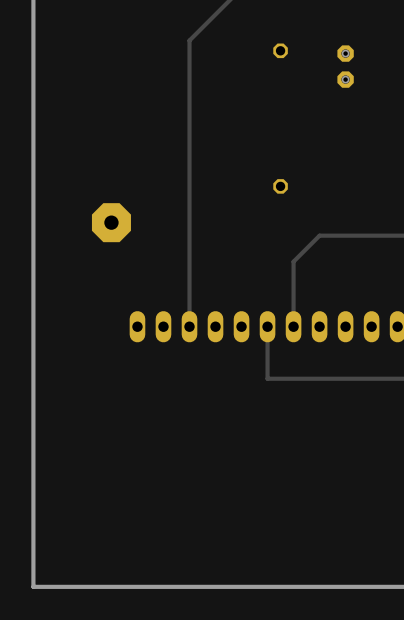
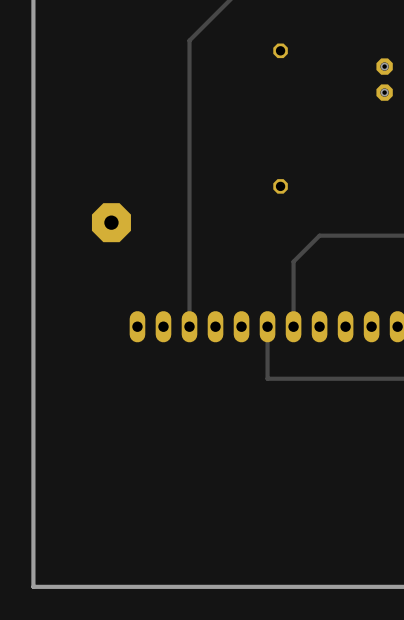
part position: (345, 66) -> (384, 79)

